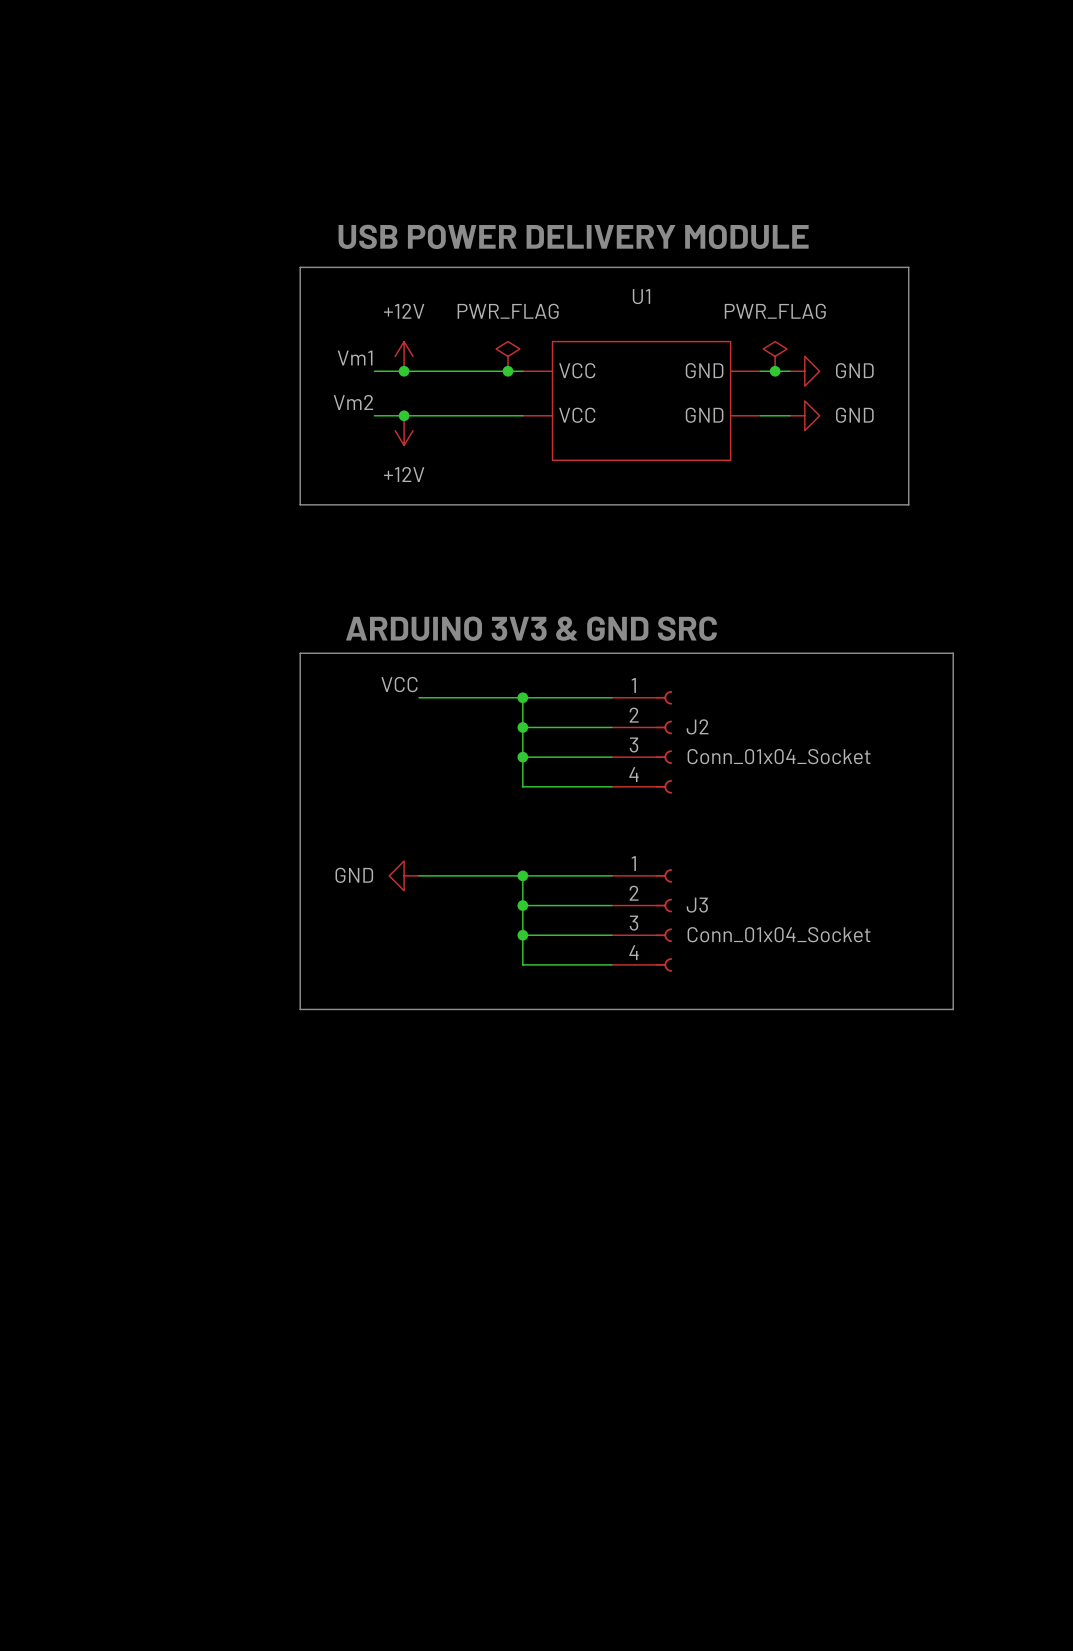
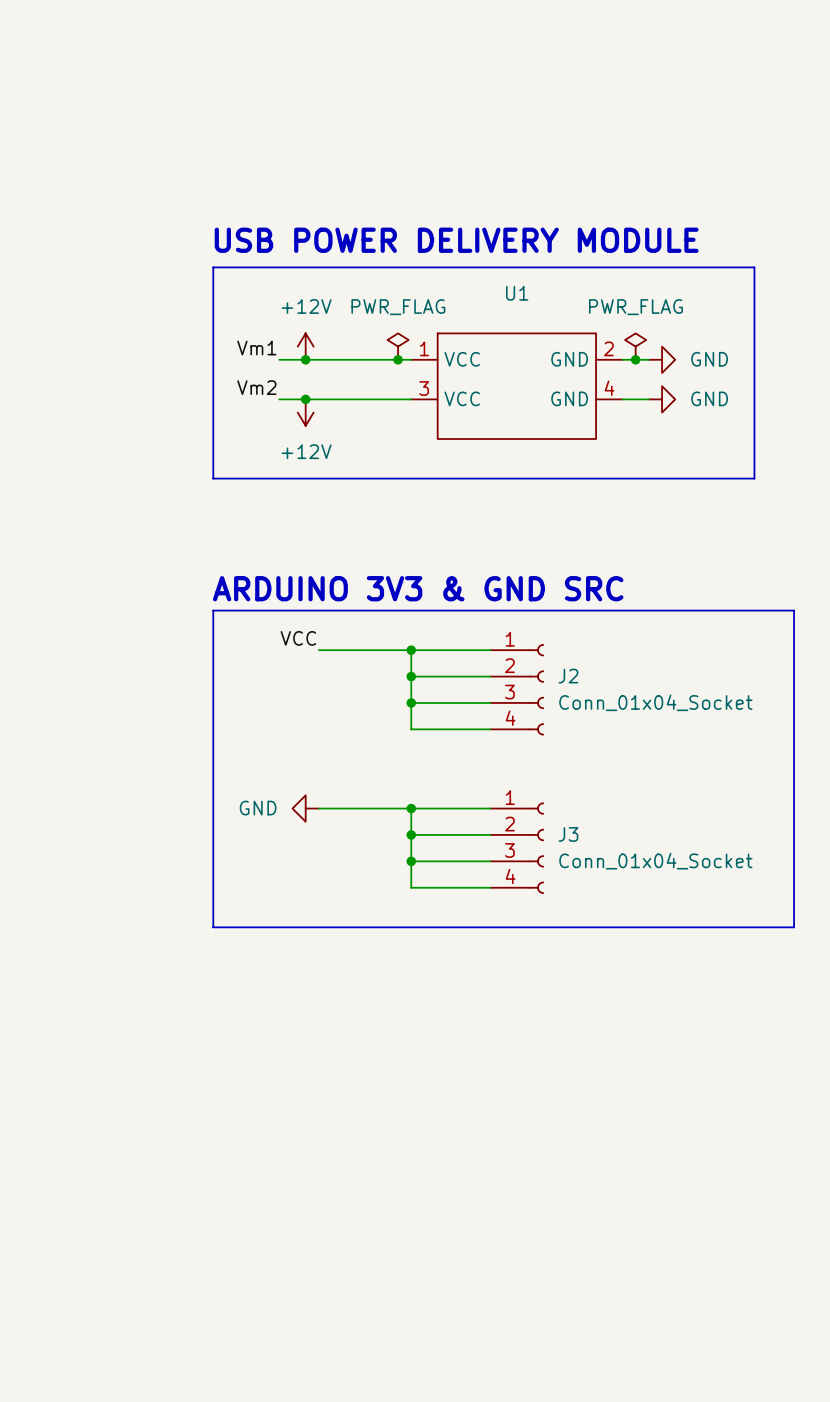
U1 pin number: none -> 2 (608, 348)
U1 pin number: none -> 1 (424, 348)
U1 pin number: none -> 3 (424, 388)
U1 pin number: none -> 4 (609, 388)

